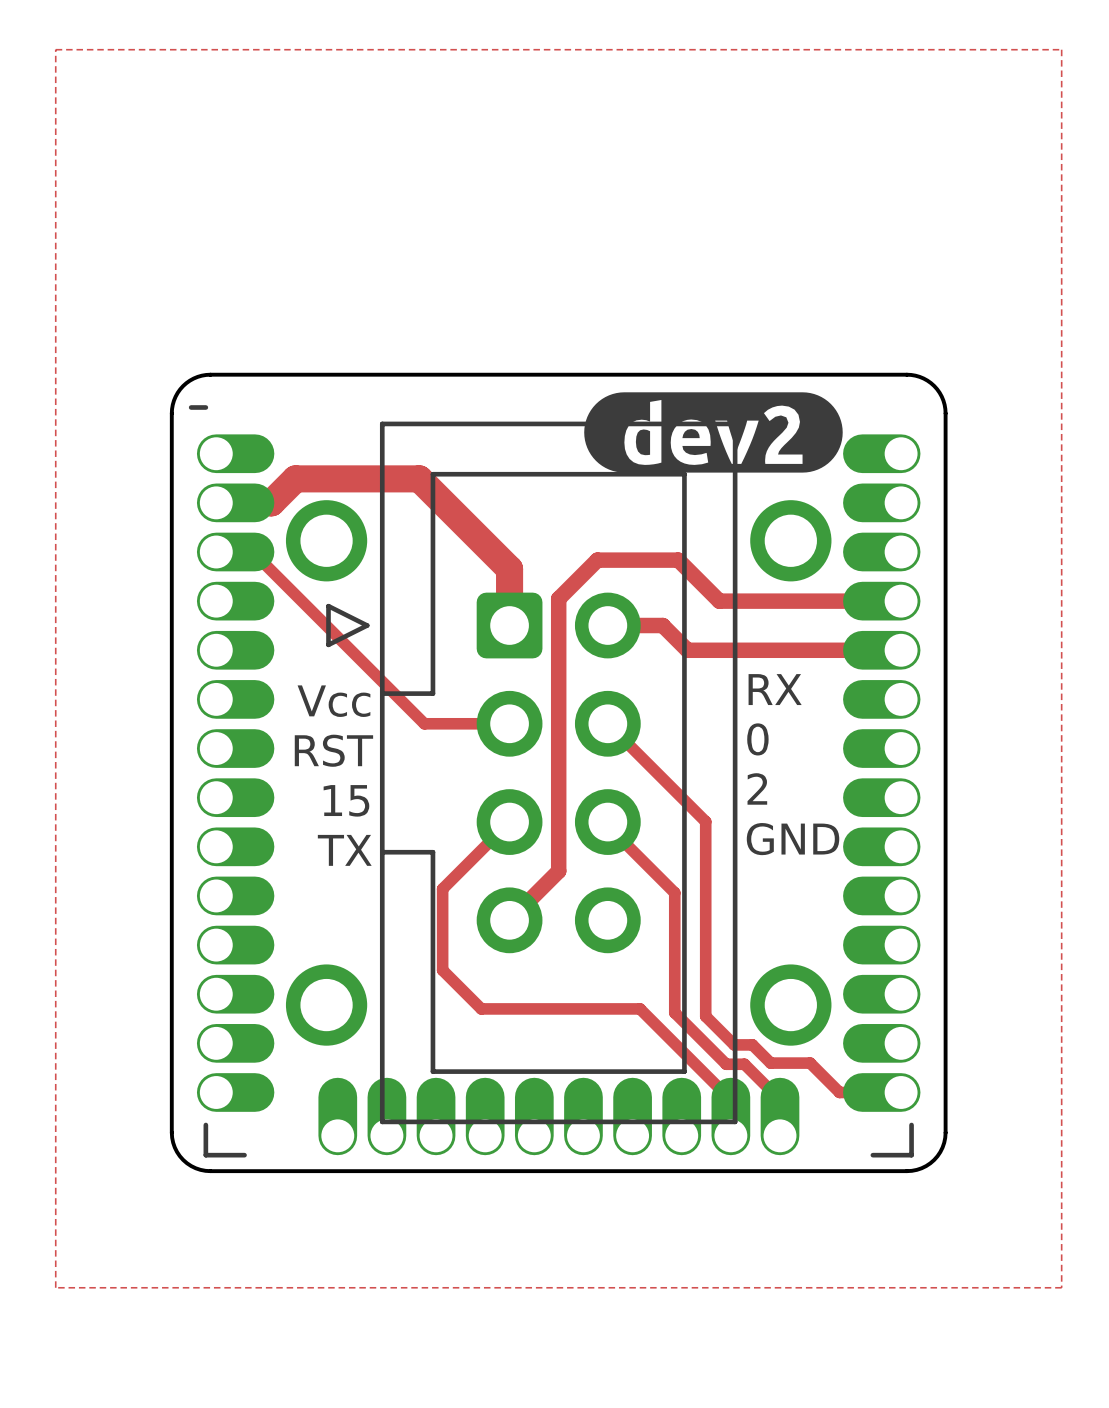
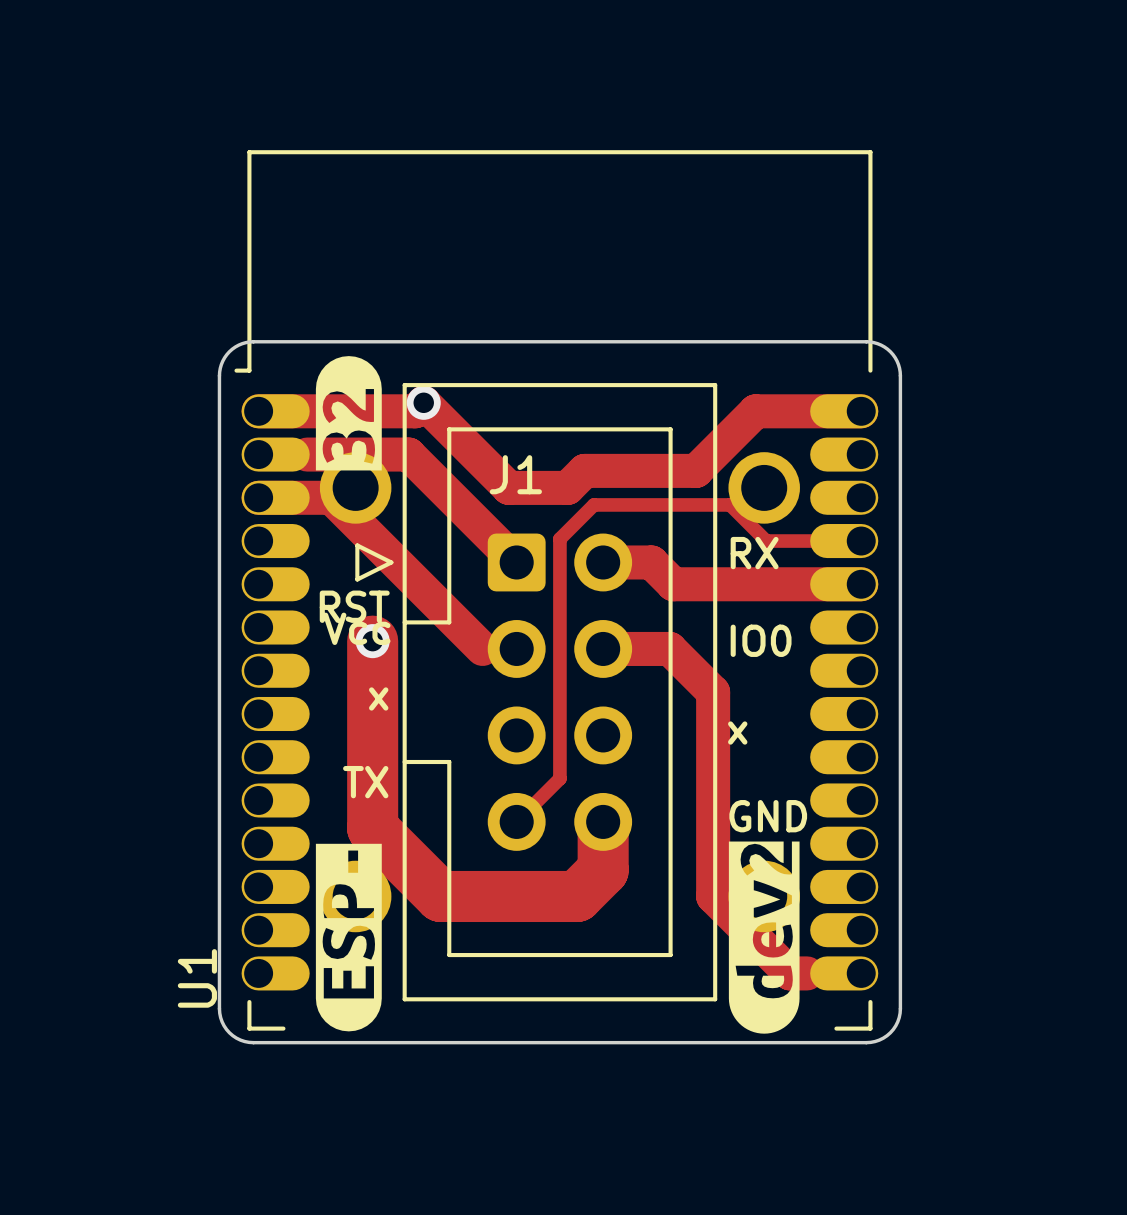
zone outline: (55, 49) (55, 1287) (1061, 1287) (1061, 49) (55, 49) -> none
drawing: none -> [315, 356, 382, 471]
drawing: [584, 392, 843, 473] -> none
via: none -> (423, 402)
track: none -> (258, 411) (415, 411) (423, 402) (508, 487) (567, 487) (584, 470) (696, 470) (755, 411) (861, 411)
track: (271, 502) (295, 478) (419, 478) (509, 569) (509, 625) -> (307, 454) (408, 454) (516, 562)
J1 name: none -> J1 (515, 474)
track: (252, 552) (424, 723) (470, 723) -> (290, 497) (331, 497) (482, 648)
track: (678, 560) (719, 601) (793, 601) -> (665, 504) (730, 504) (766, 541)
track width: thin (607, 625) (662, 625) (687, 650) (901, 650) -> thick (603, 562) (651, 562) (673, 584) (861, 584)
U1: none -> (556, 590)
text position: RX (775, 689) -> RX (754, 553)
track: none -> (372, 641) (372, 828) (440, 896) (576, 896) (603, 870) (603, 821)
via: none -> (372, 641)
track: (607, 723) (705, 821) (705, 1016) (734, 1044) (752, 1044) (770, 1063) (810, 1063) (839, 1092) -> (603, 648) (669, 648) (713, 692) (713, 896) (790, 973) (807, 973)
text: 0 (757, 739) -> IO0 (761, 640)
text position: RST (333, 750) -> RST (354, 606)
part: (554, 781) -> none
text: 2 (757, 788) -> x (737, 733)
text: 15 (346, 800) -> x (378, 698)
track: (509, 822) (442, 888) (442, 970) (481, 1008) (640, 1008) (730, 1099) (730, 1135) -> none
track: (607, 822) (607, 825) (674, 892) (674, 1012) (726, 1064) (744, 1064) (780, 1099) (780, 1135) -> none
text position: GND (793, 839) -> GND (768, 816)
text position: TX (344, 850) -> TX (365, 782)
drawing: none -> [728, 841, 800, 1034]
drawing: none -> [315, 843, 382, 1032]

